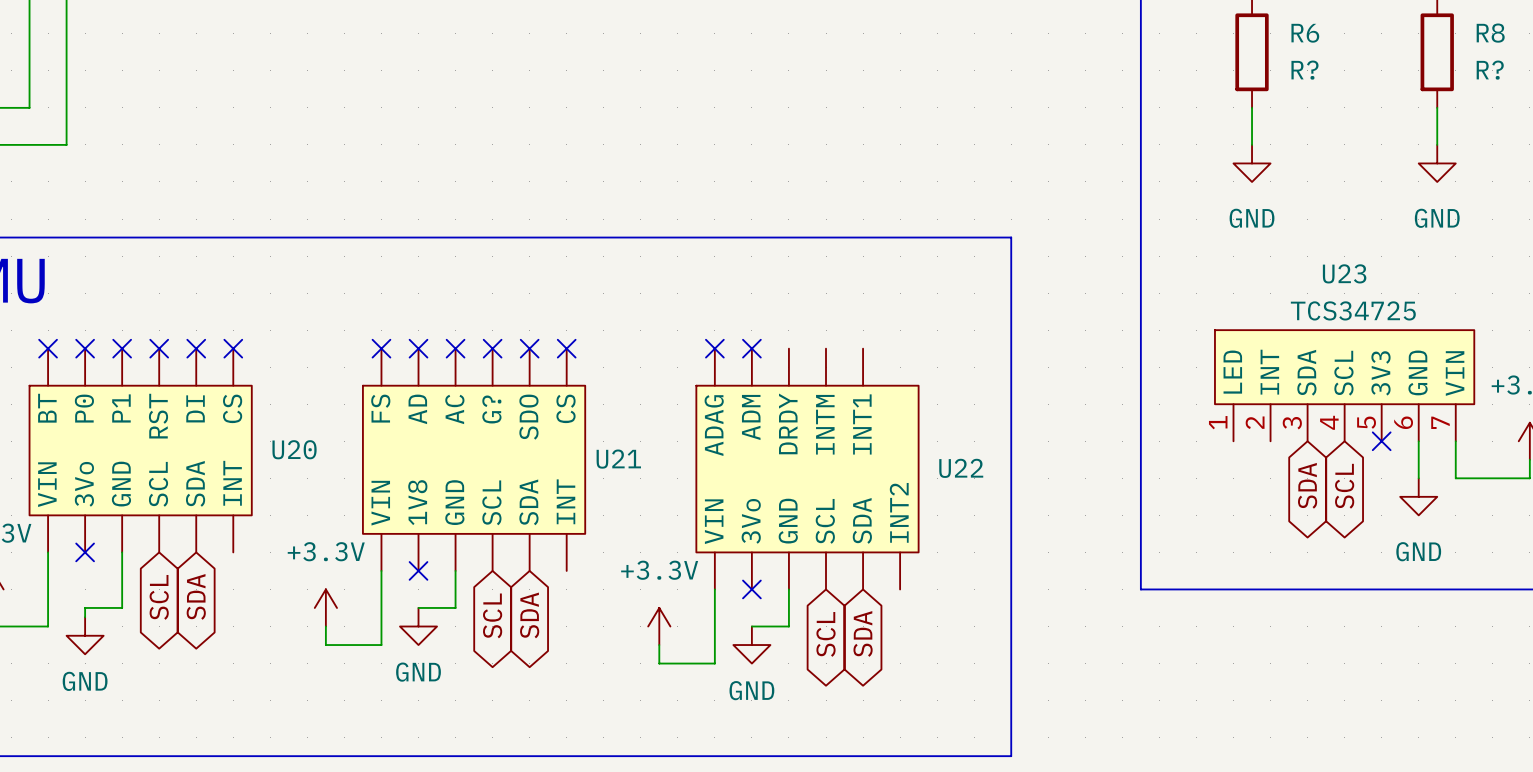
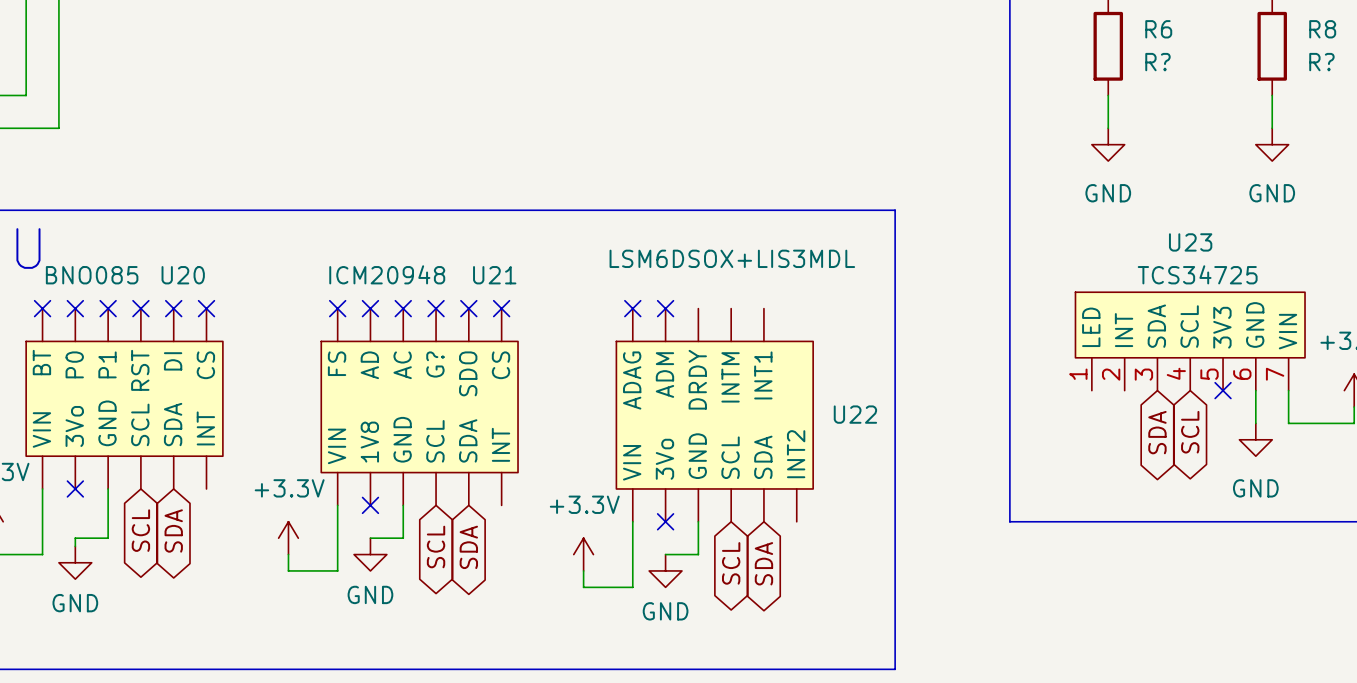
U22 value: none -> LSM6DSOX+LIS3MDL (732, 258)
U20 value: none -> BNO085 (92, 275)
U21 value: none -> ICM20948 (387, 274)
U20 name position: U20 (294, 449) -> U20 (183, 275)
U21 name position: U21 (618, 459) -> U21 (494, 275)

